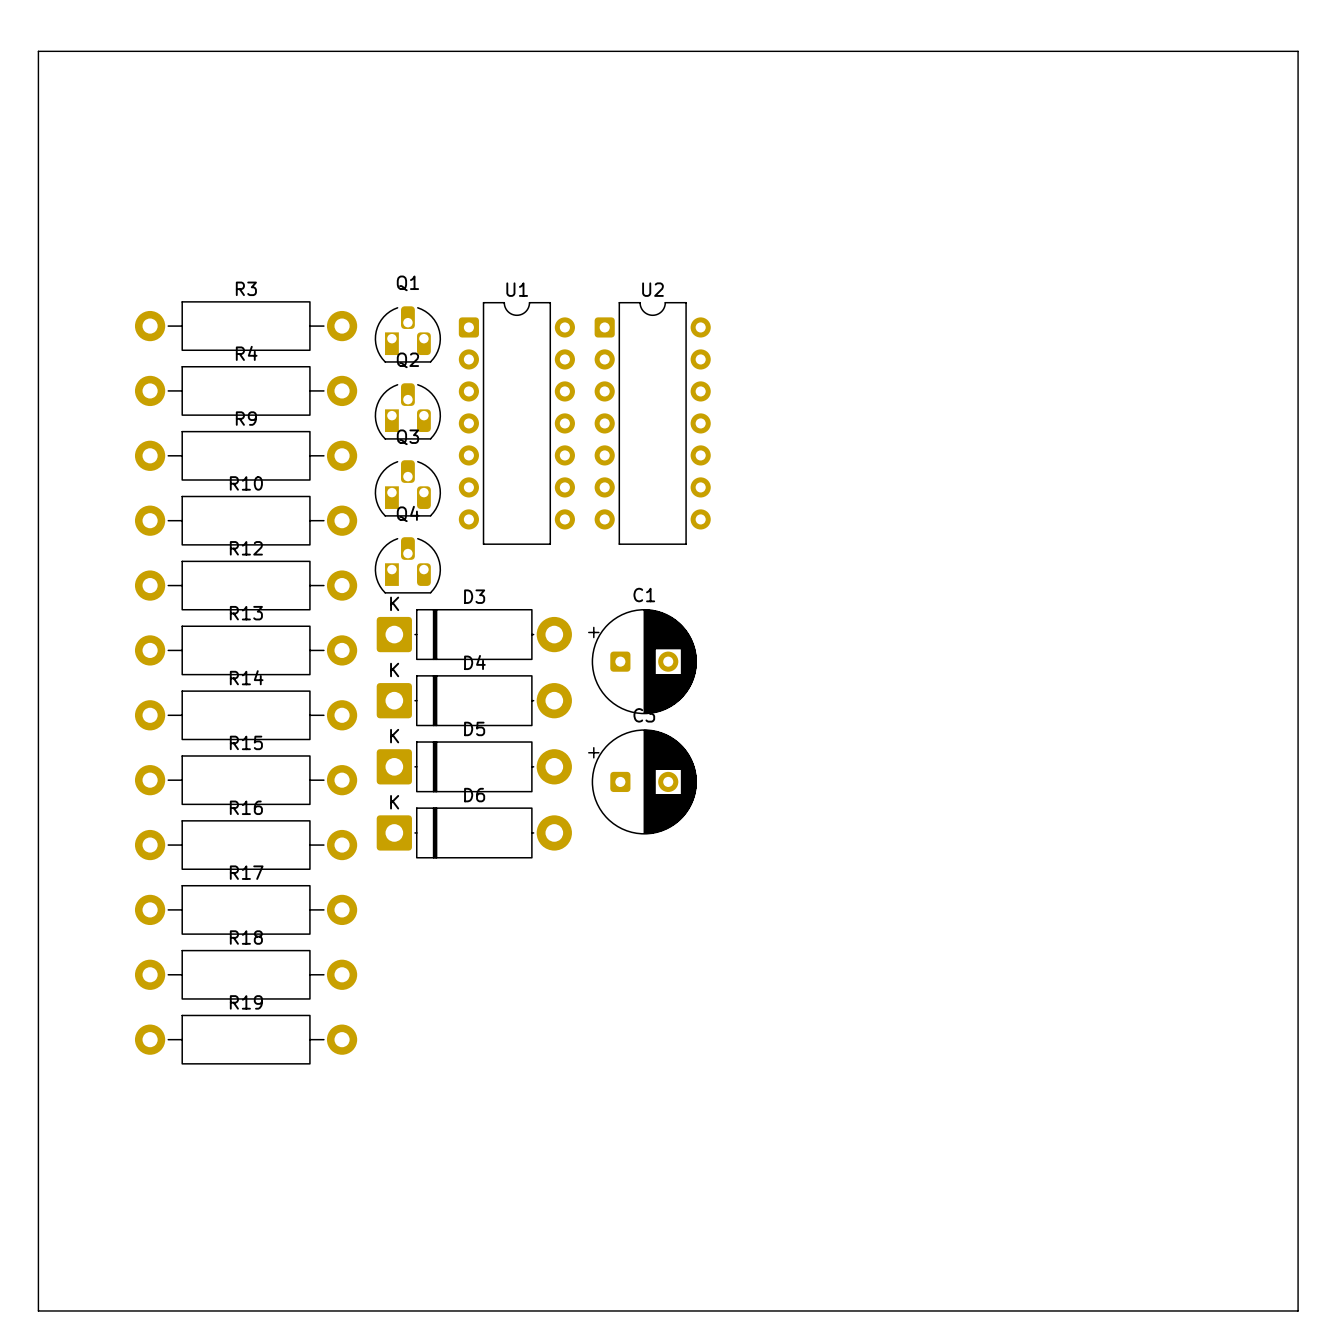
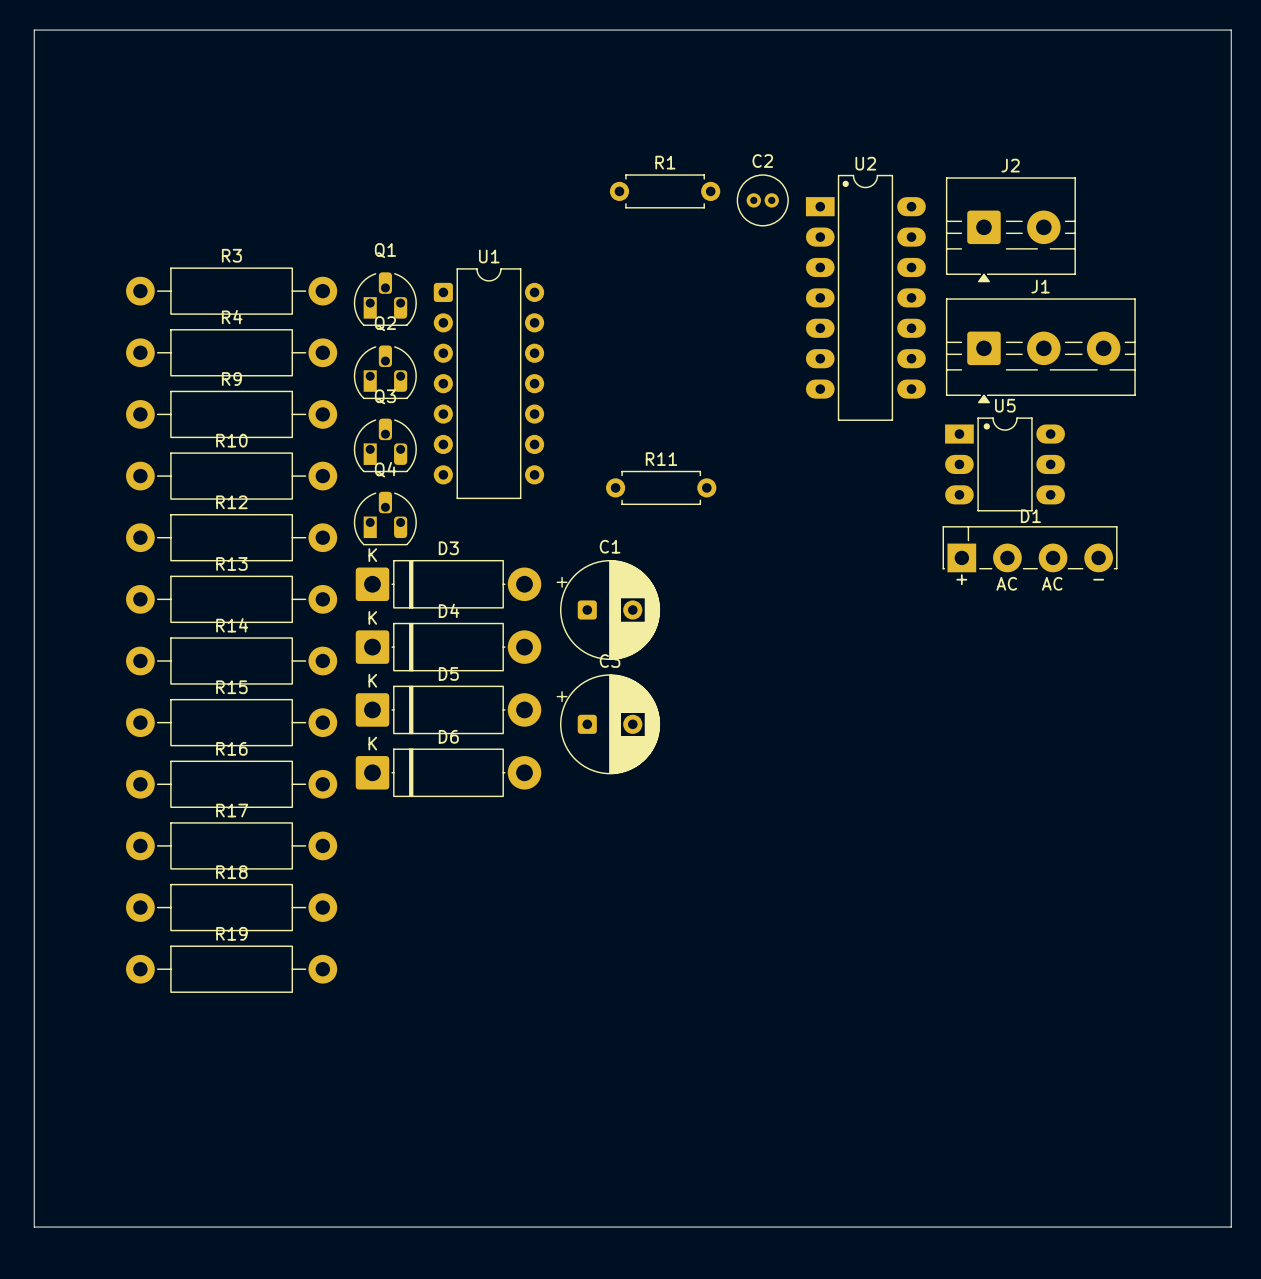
R1: none -> (665, 191)
C2: none -> (762, 200)
J2: none -> (1010, 229)
U2 footprint: [594, 301, 711, 545] -> [805, 174, 926, 421]
J1: none -> (1040, 350)
U5: none -> (1005, 464)
R11: none -> (661, 487)
D1: none -> (1030, 549)

